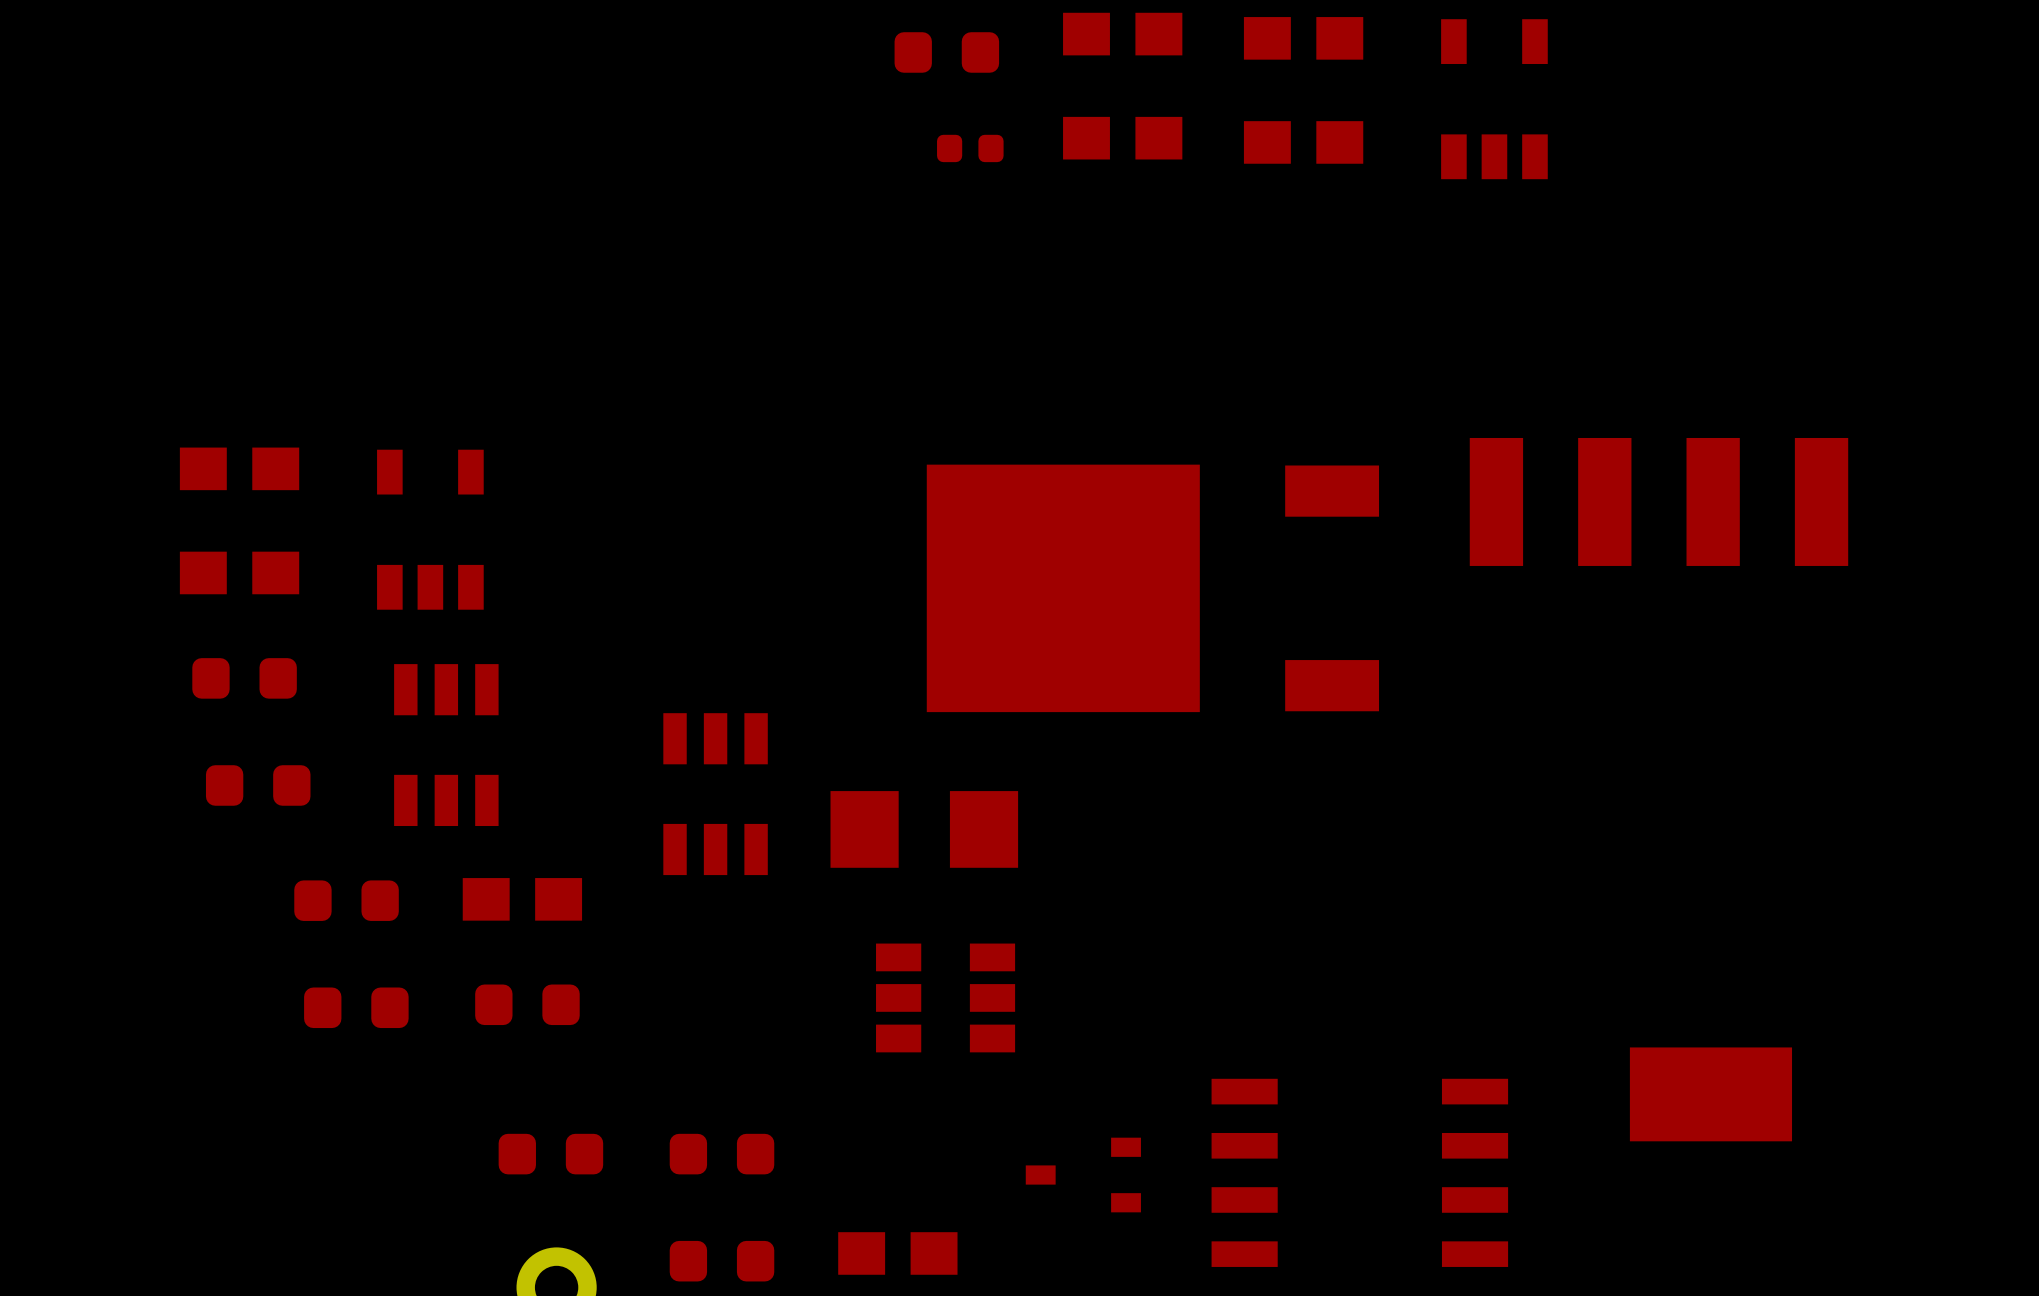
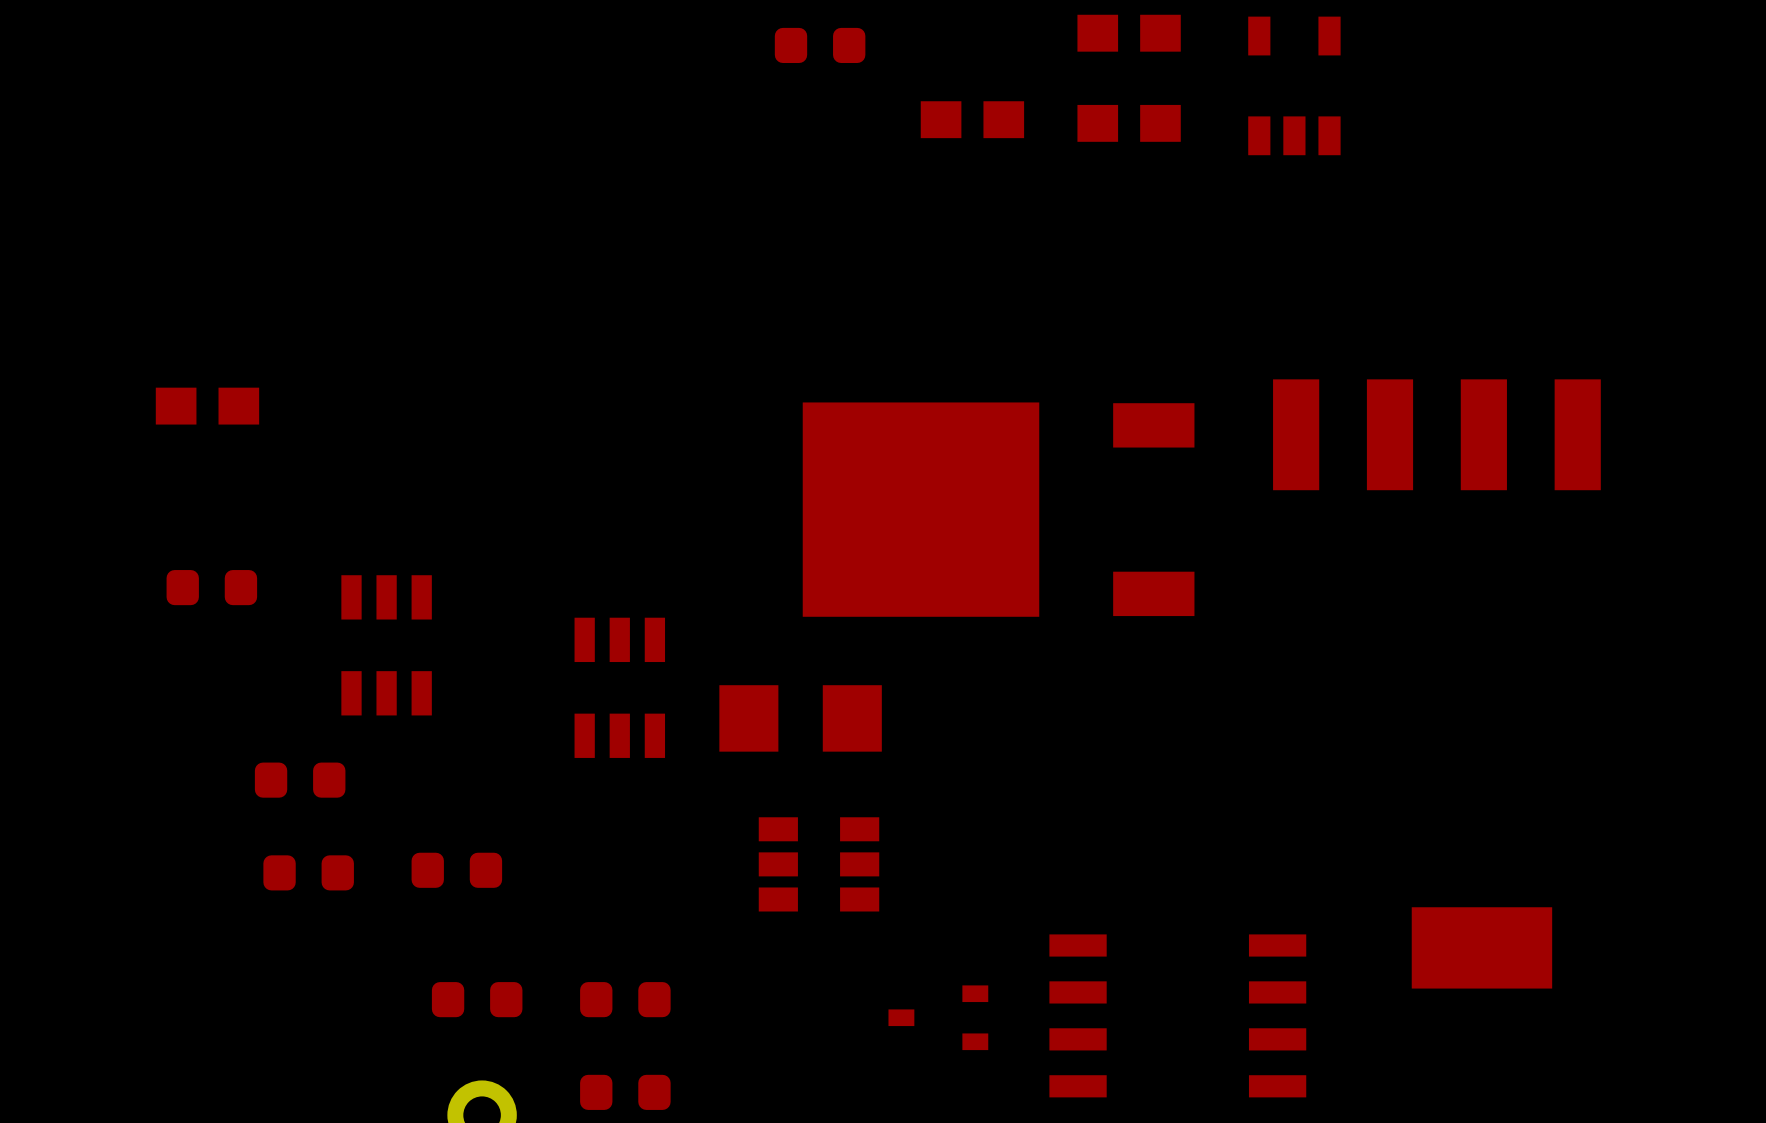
part: (1122, 34) -> none
part: (970, 148) -> none
part: (430, 529) -> none
part: (239, 572) -> none
part: (258, 785) -> none
part: (522, 899) -> none
part: (897, 1253) -> none

